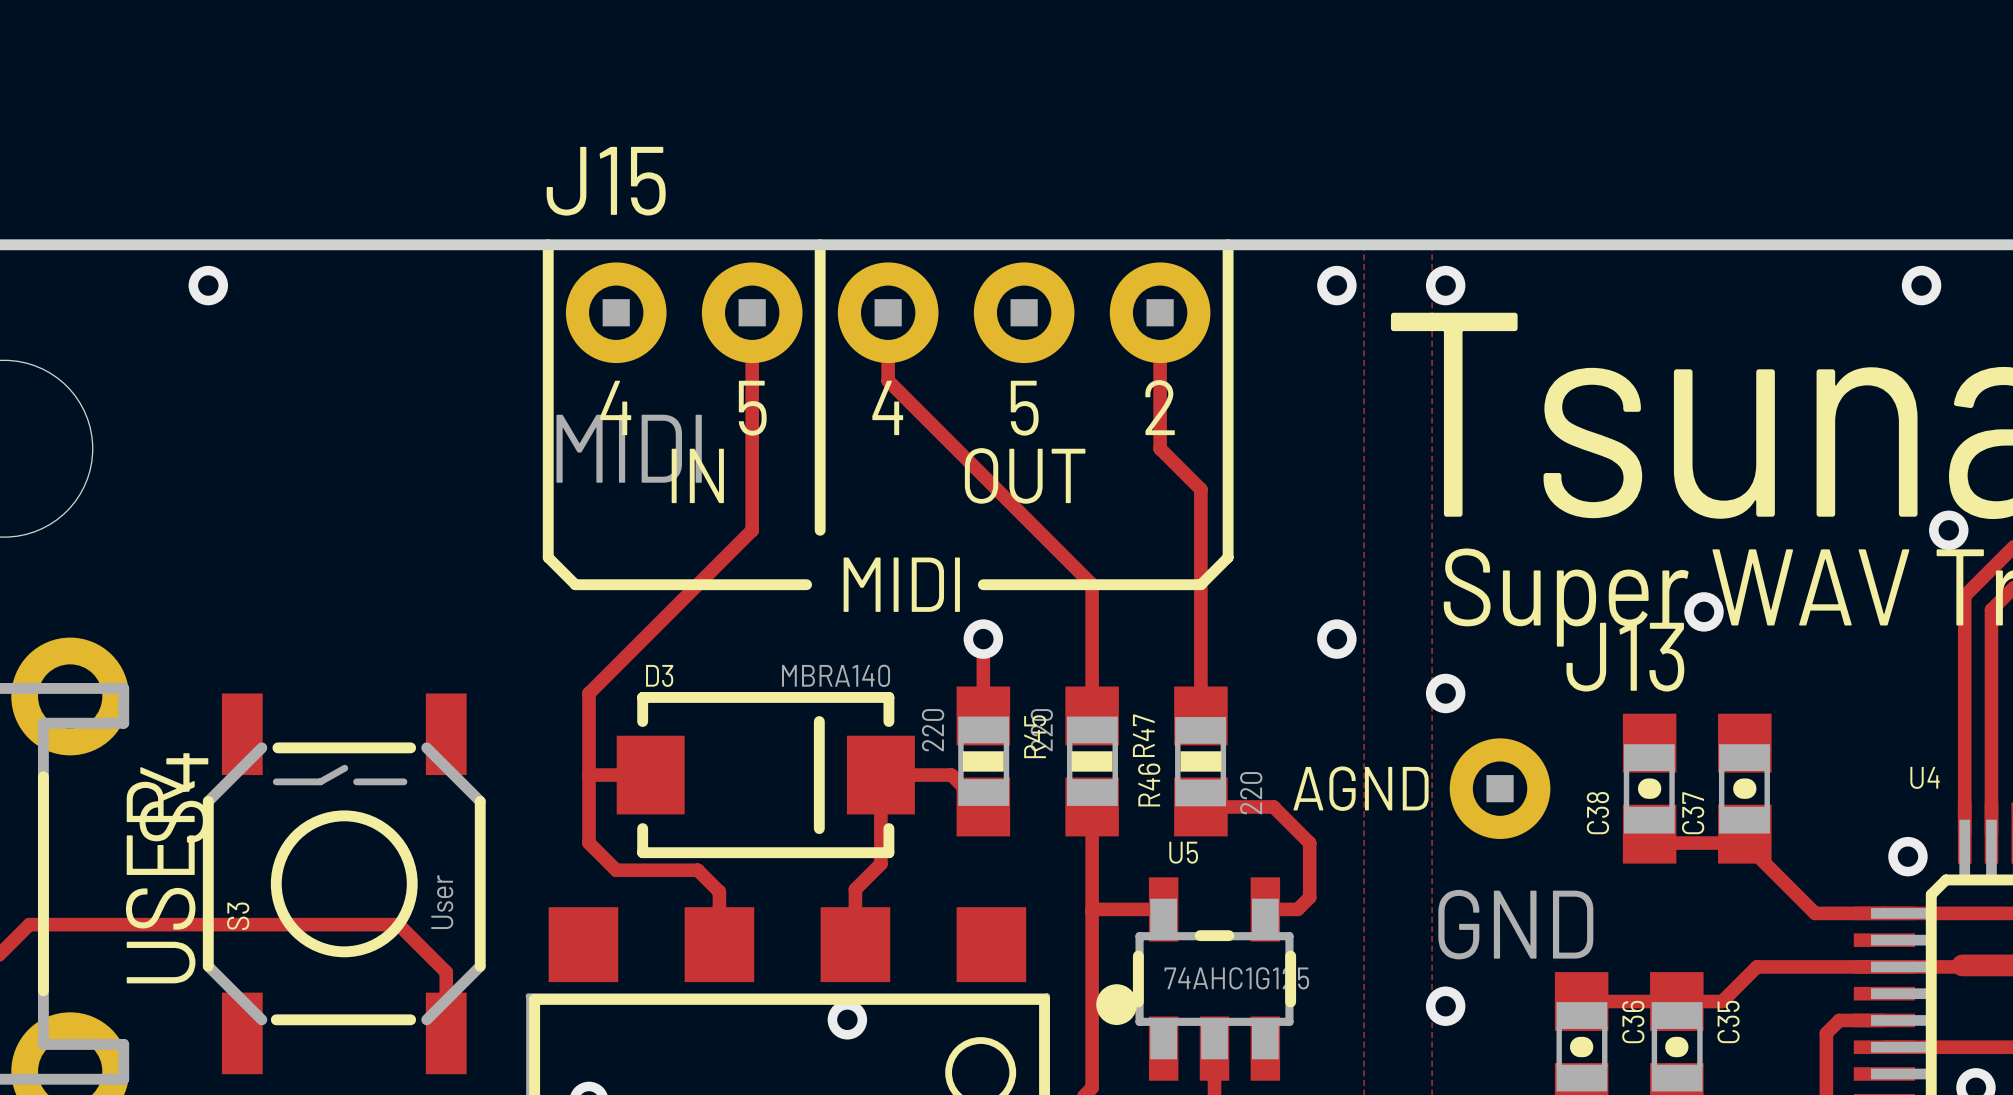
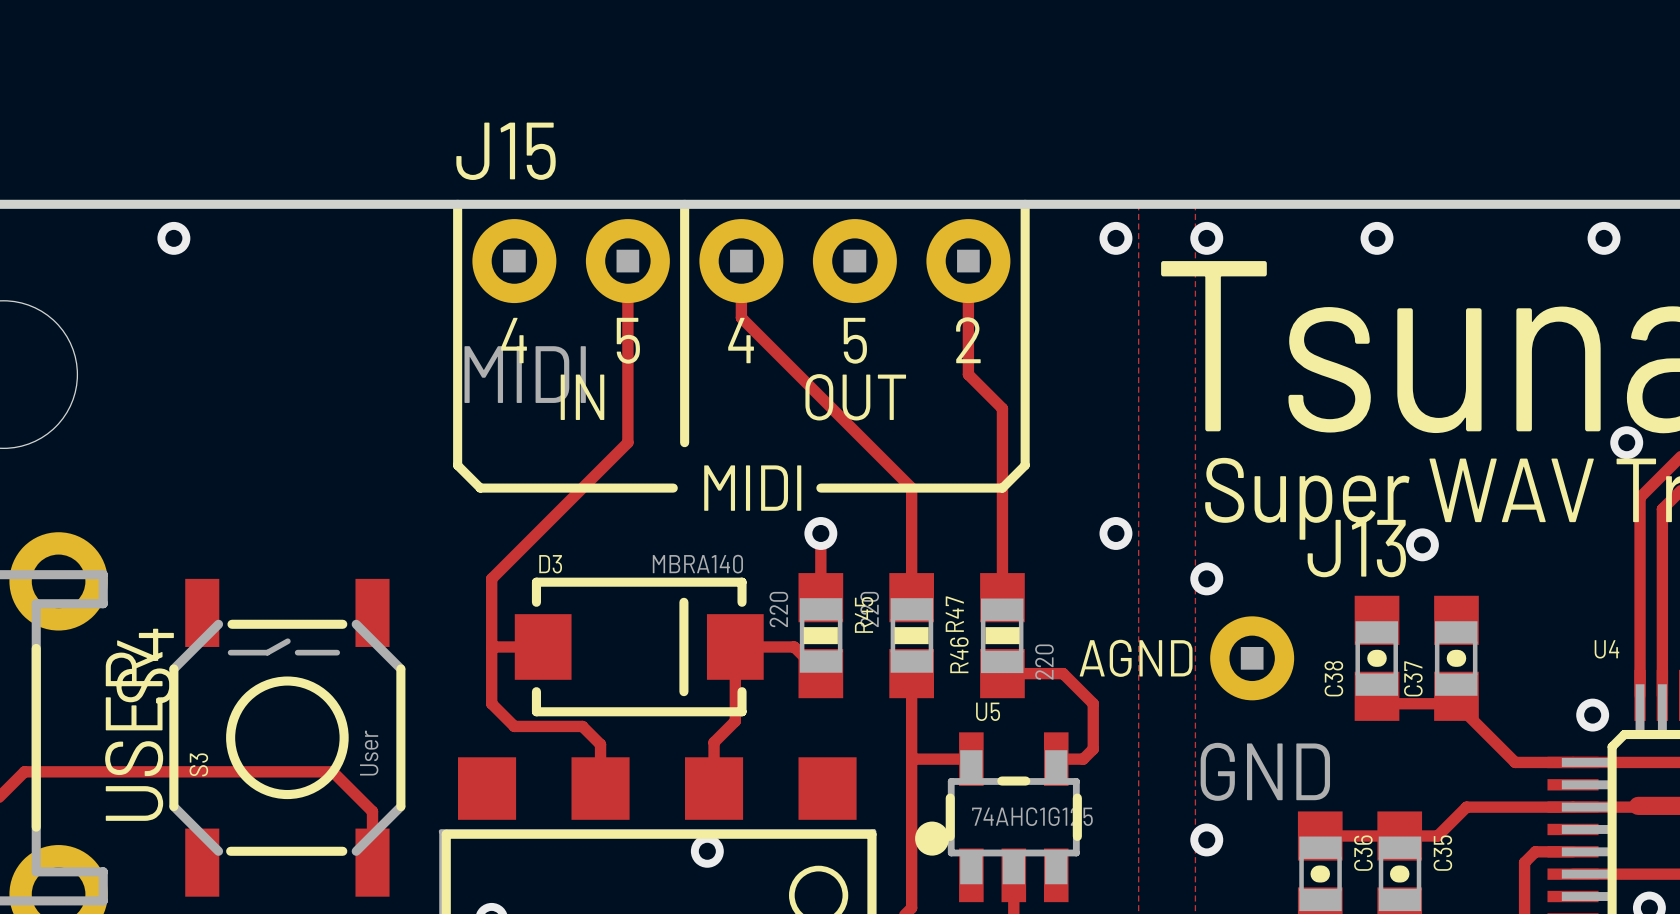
via: none -> (1377, 238)
via position: (1704, 611) -> (1422, 544)

